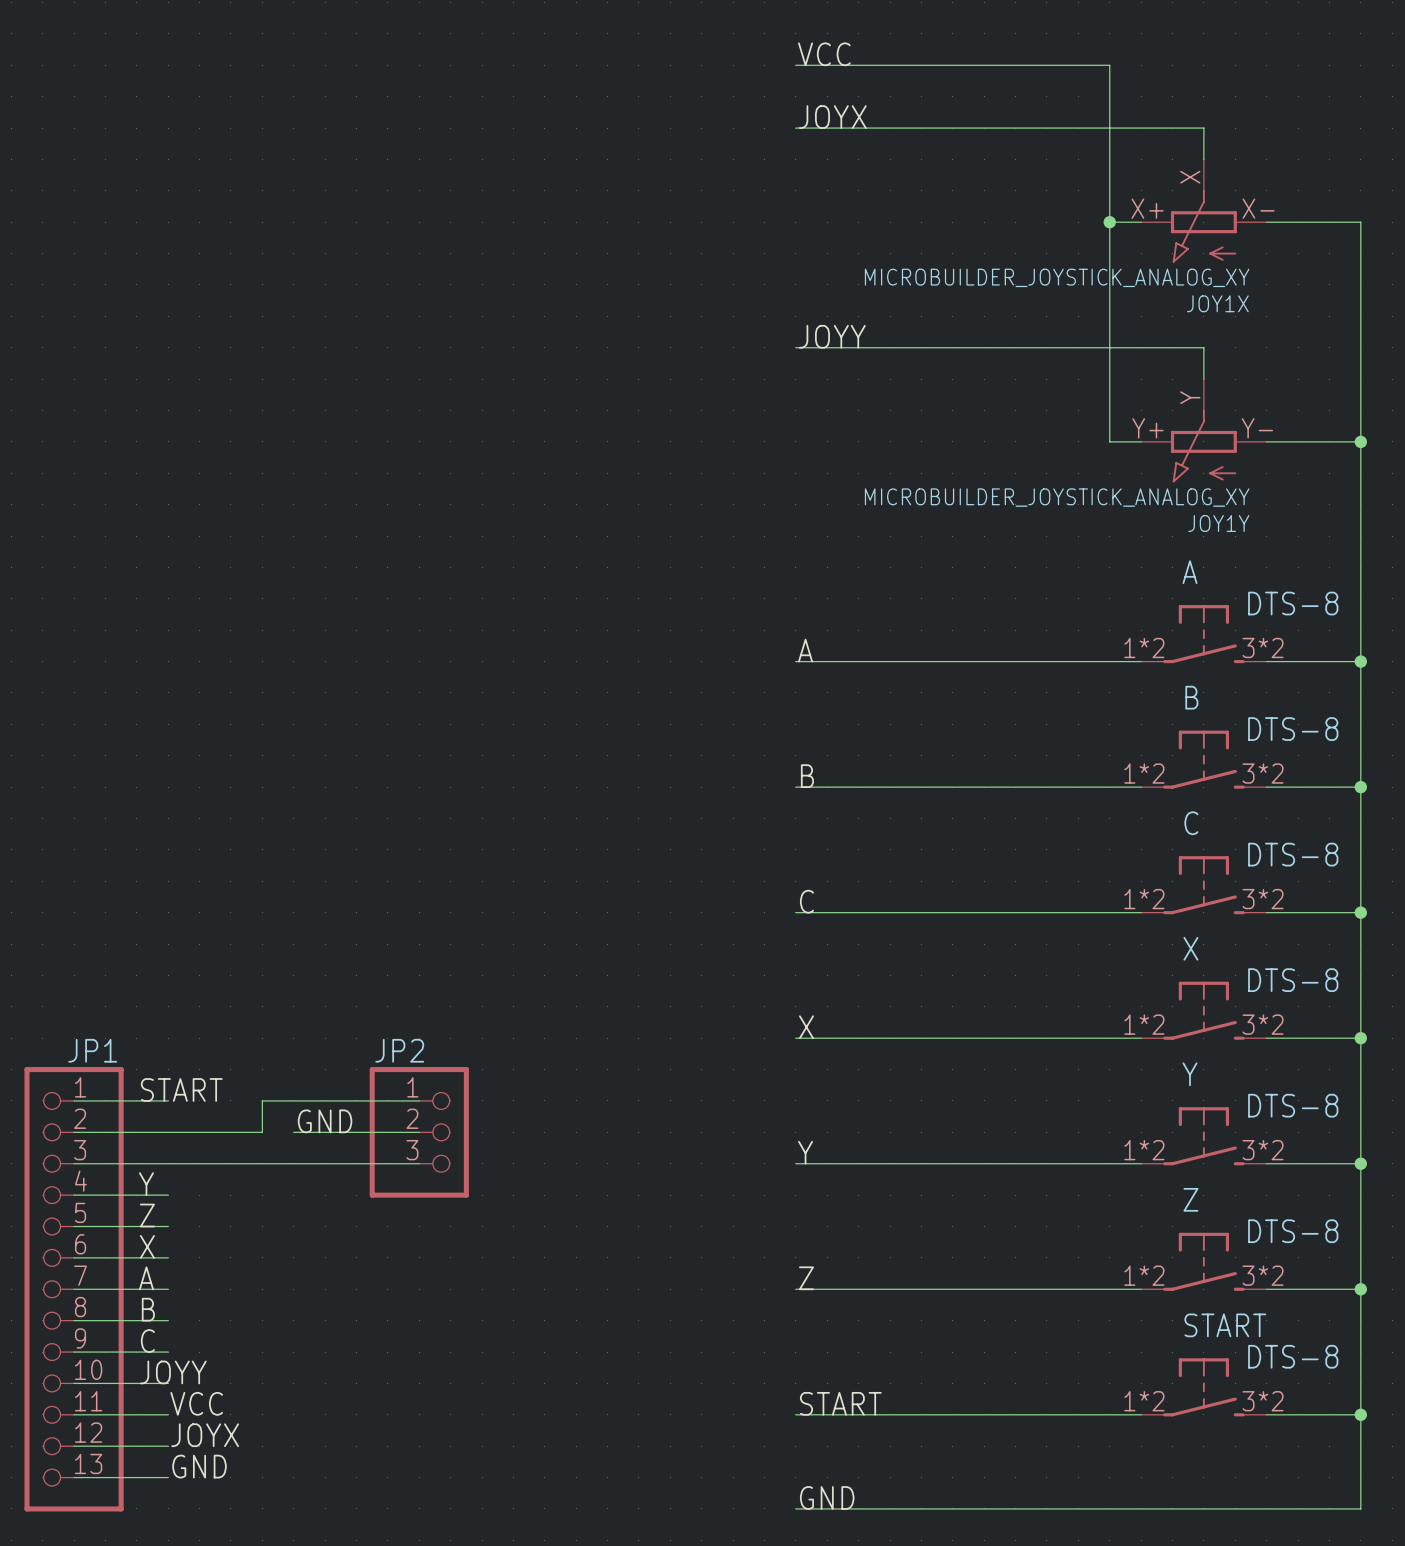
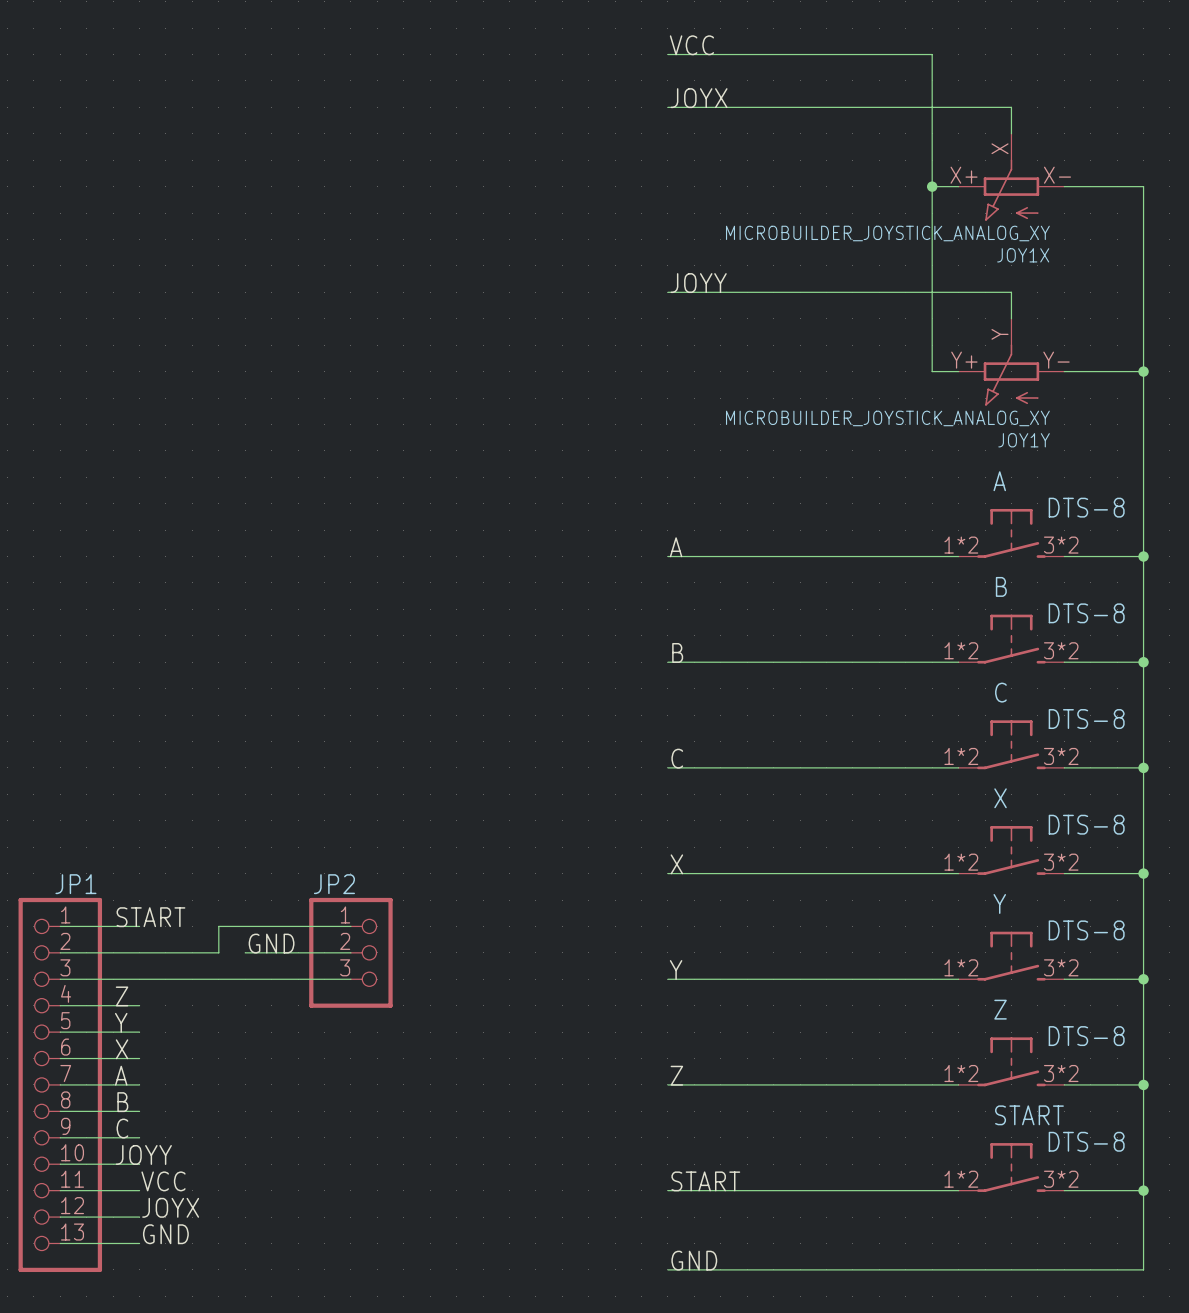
label: Y (146, 1184) -> Z (122, 996)
label: Z (147, 1215) -> Y (121, 1022)

